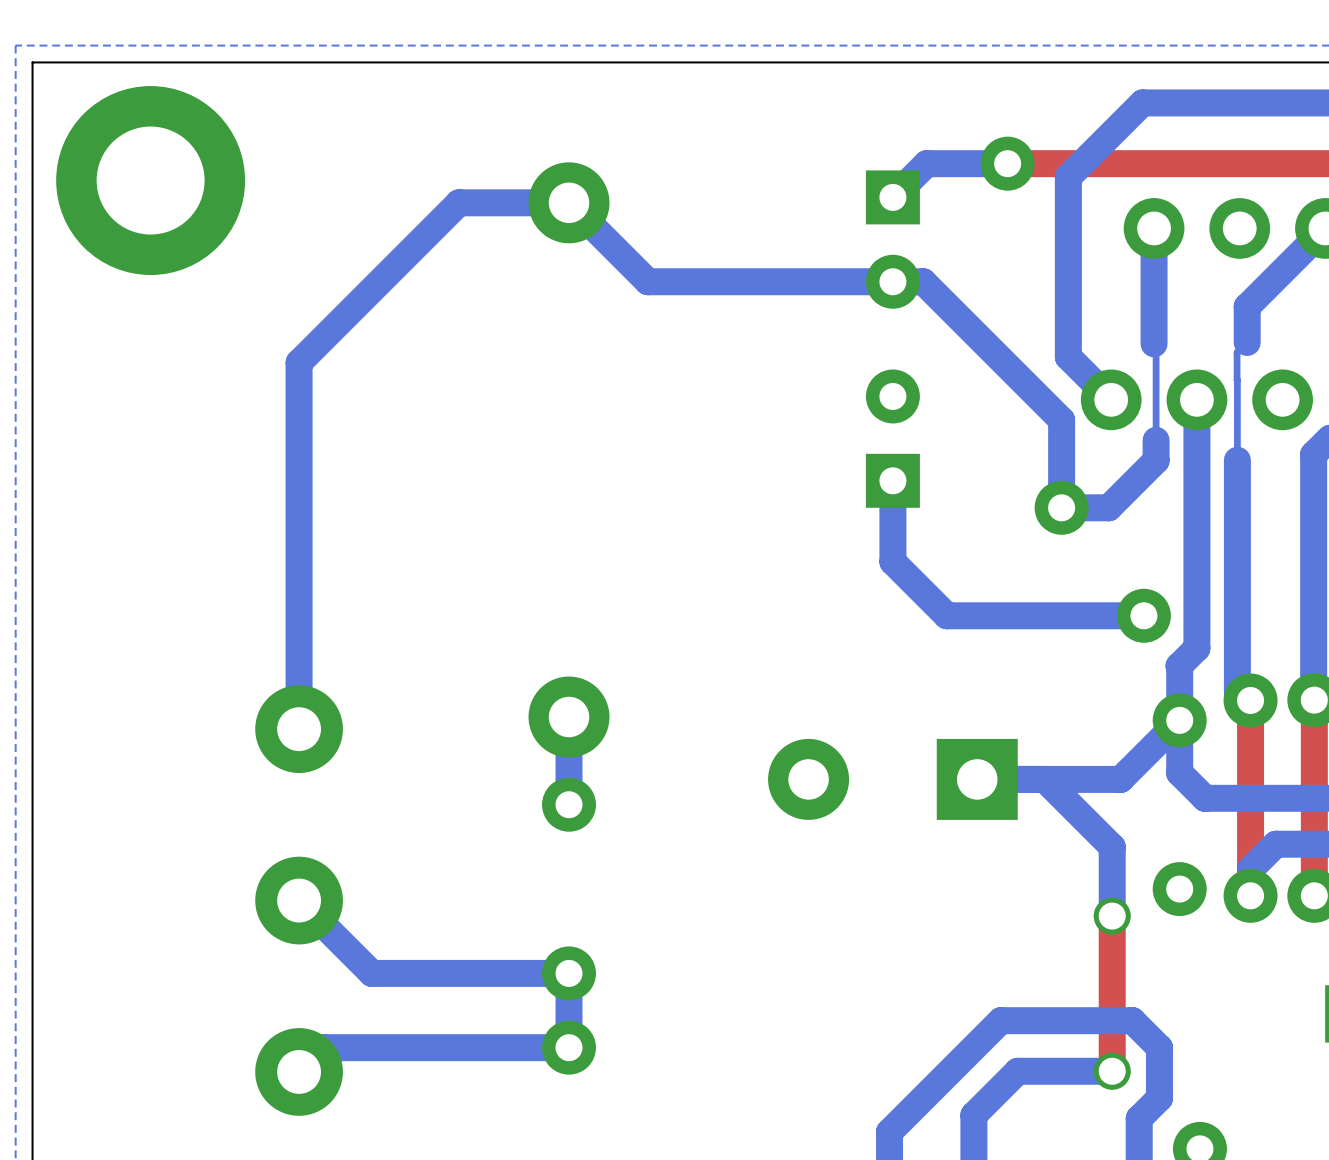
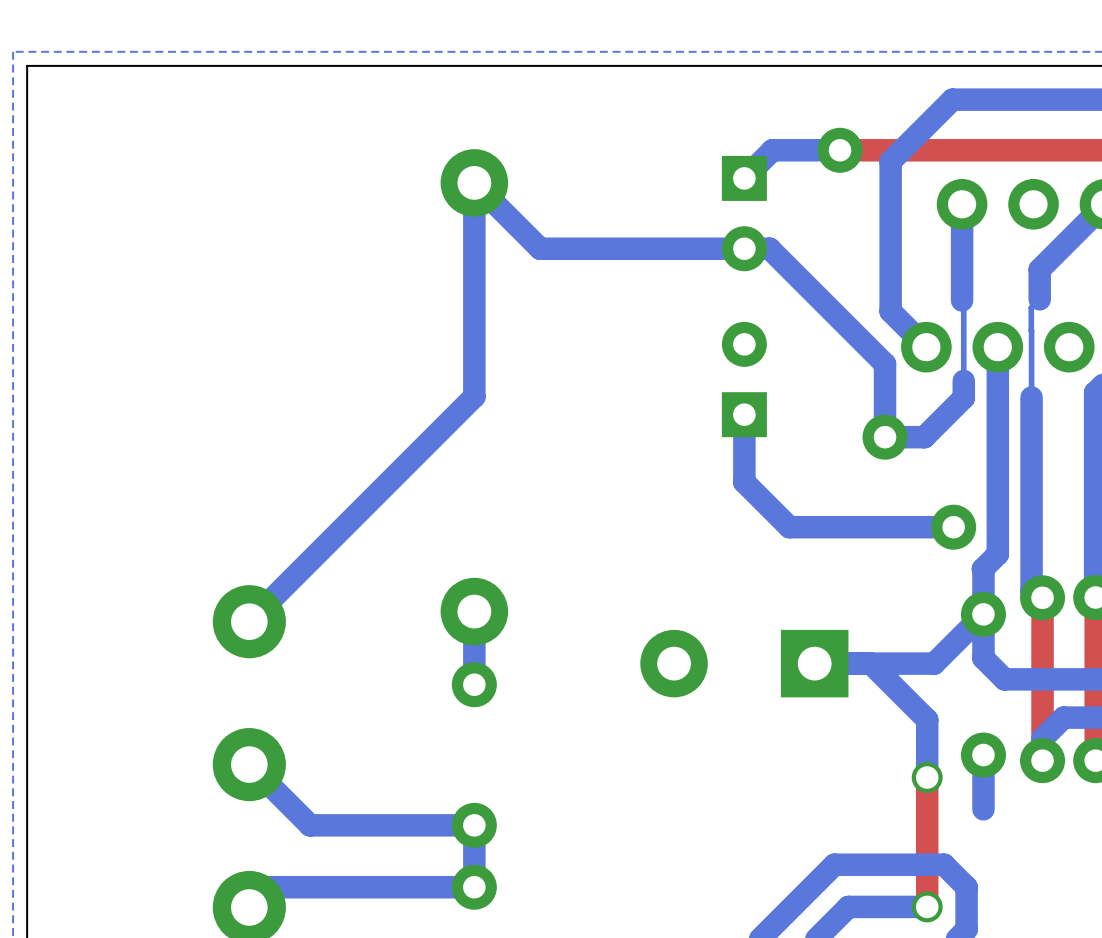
part: (150, 180) -> none
bottom track: (569, 202) (459, 202) (299, 362) (299, 729) -> (474, 182) (474, 396) (249, 621)
bottom track: none -> (983, 755) (983, 809)

